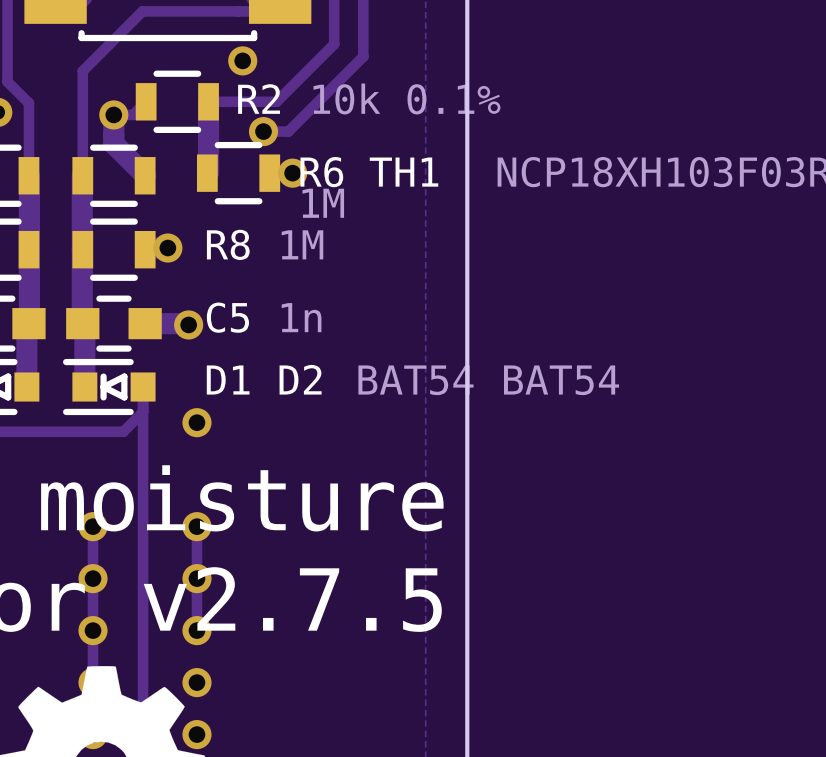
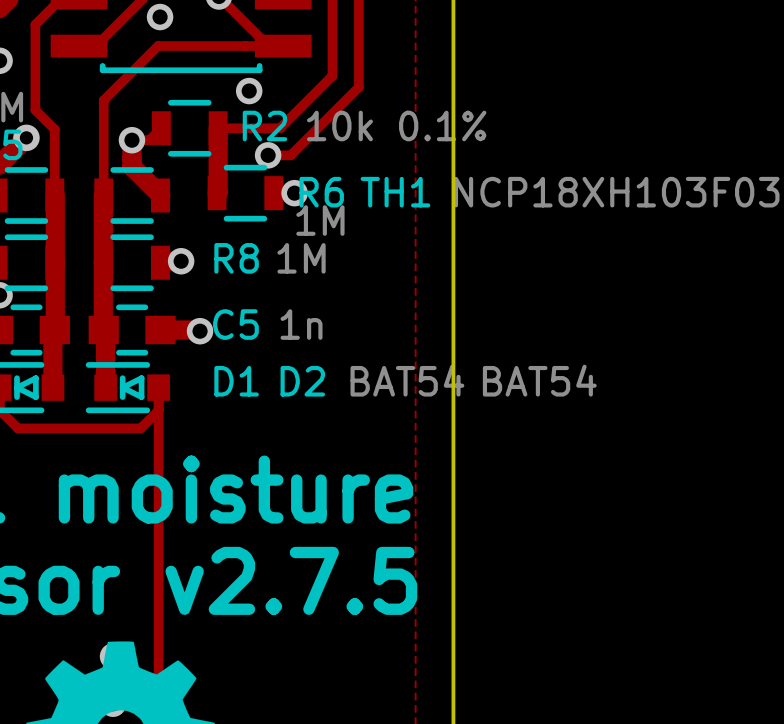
via: (196, 422) -> none
track: (93, 526) (93, 682) -> none
via: (93, 526) -> none
track: (196, 526) (196, 630) -> none
via: (196, 526) -> none
via: (93, 578) -> none
via: (196, 578) -> none
via: (93, 630) -> none
via: (196, 630) -> none
via: (196, 682) -> none
via: (196, 734) -> none

